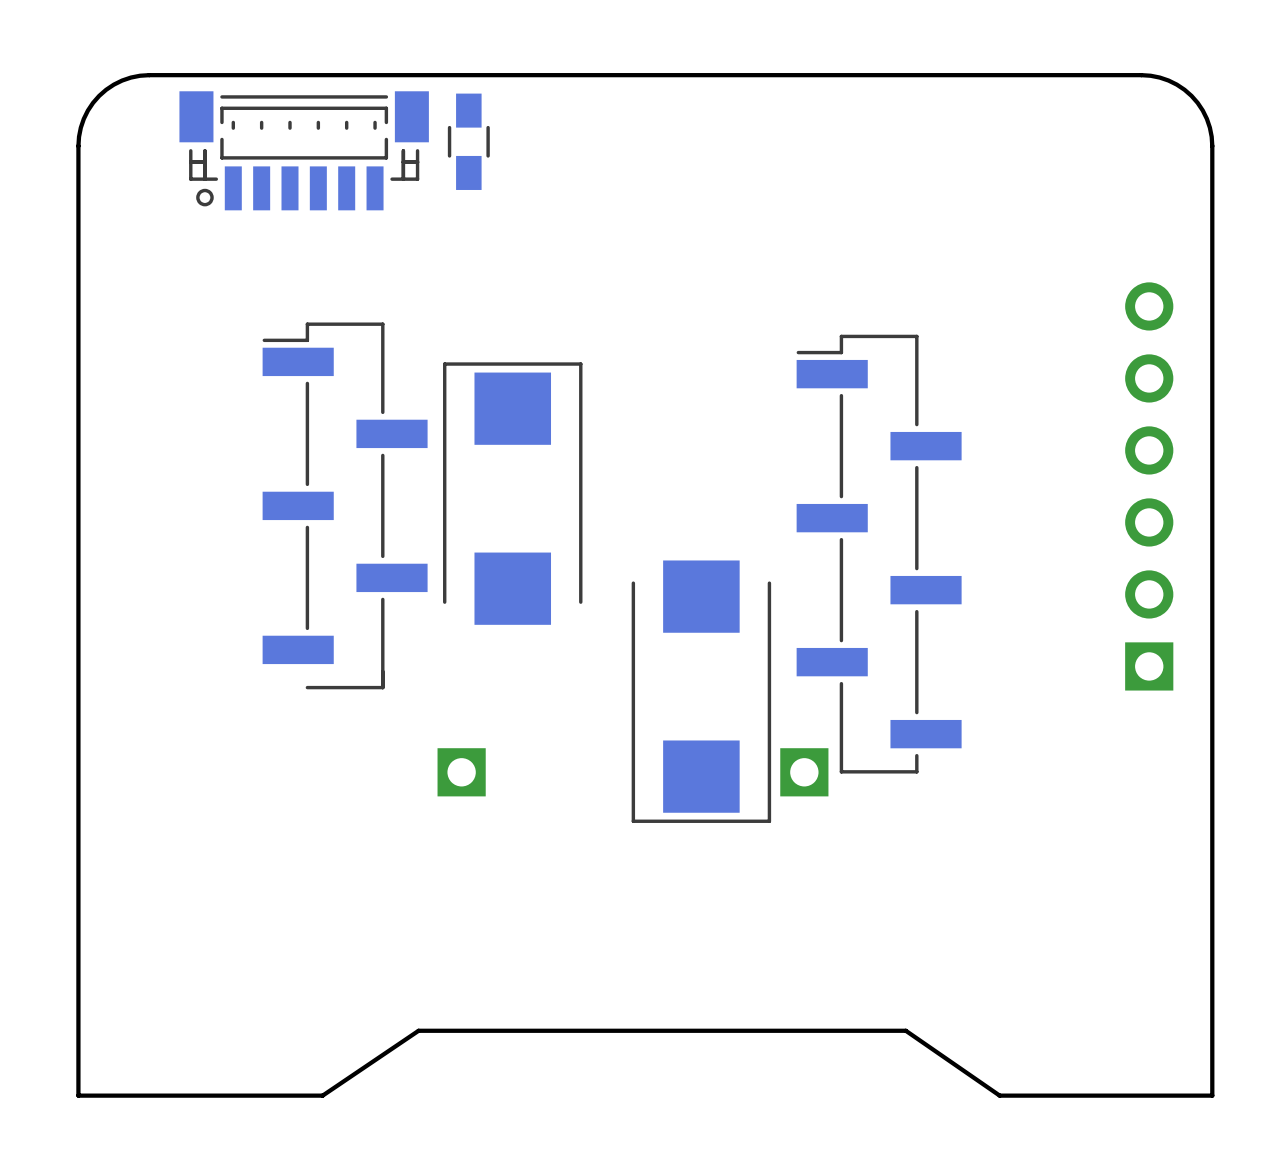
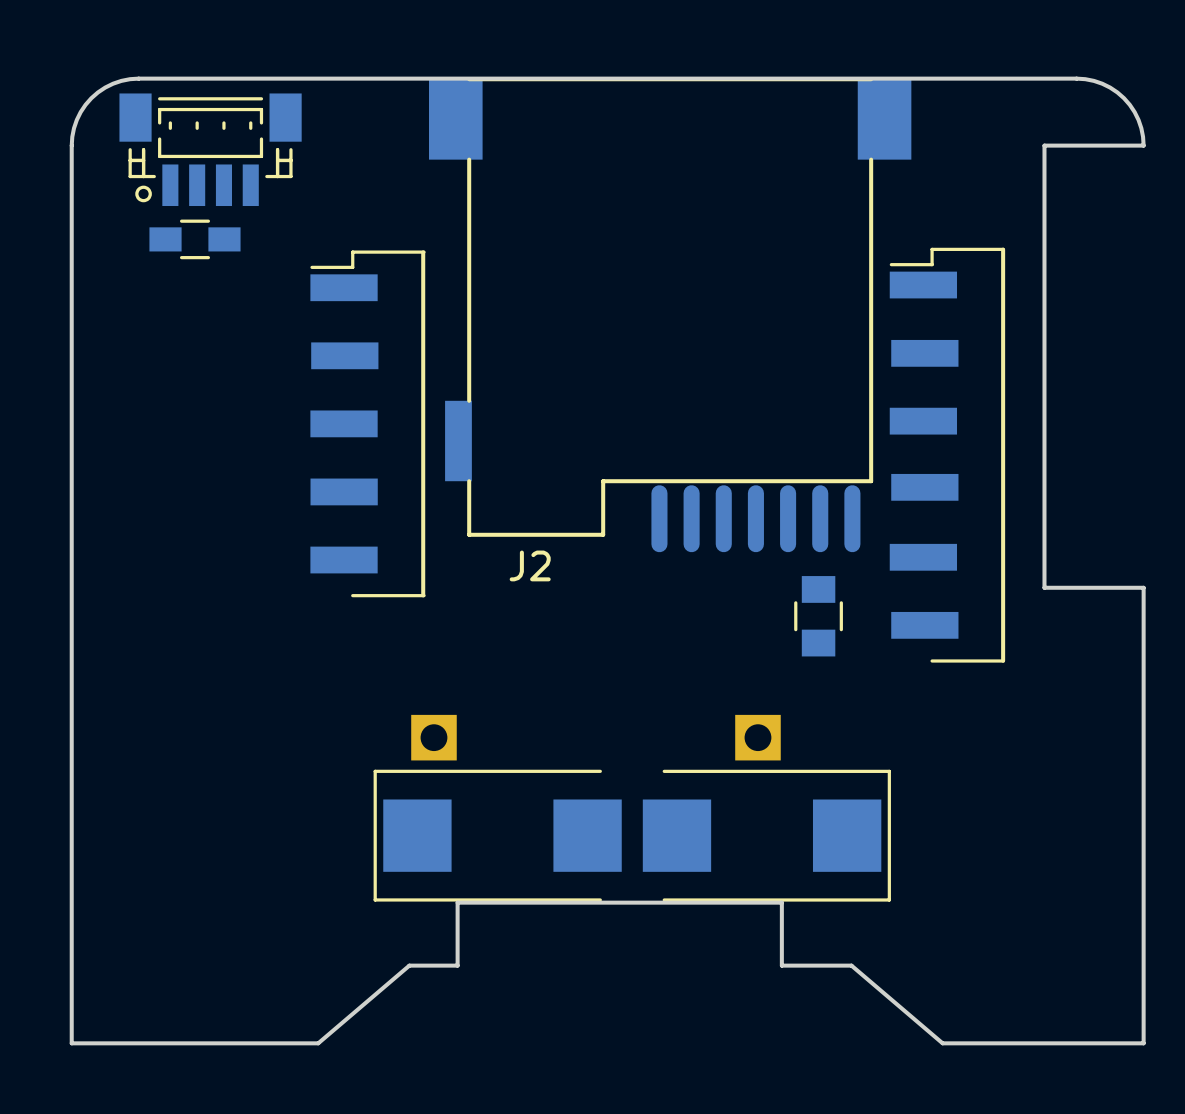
part rotation: 0° (468, 141) -> 90° clockwise (194, 239)
part position: (468, 141) -> (194, 239)
board edge: (1212, 146) (1212, 613) -> (1143, 145) (1044, 145) (1044, 587) (1143, 587)
part: none -> (210, 149)
part: (304, 150) -> none
J2: none -> (670, 314)
part: none -> (368, 423)
part: none -> (947, 455)
part: (1149, 486) -> none
part: (512, 493) -> none
part: (345, 505) -> none
part: (879, 554) -> none
part: none -> (818, 616)
part: (701, 691) -> none
part: none -> (497, 835)
part: none -> (766, 835)
board edge: (999, 1095) (905, 1030) (418, 1030) (322, 1095) -> (942, 1043) (851, 965) (781, 965) (781, 902) (457, 902) (457, 965) (409, 965) (318, 1043) (302, 1043)

